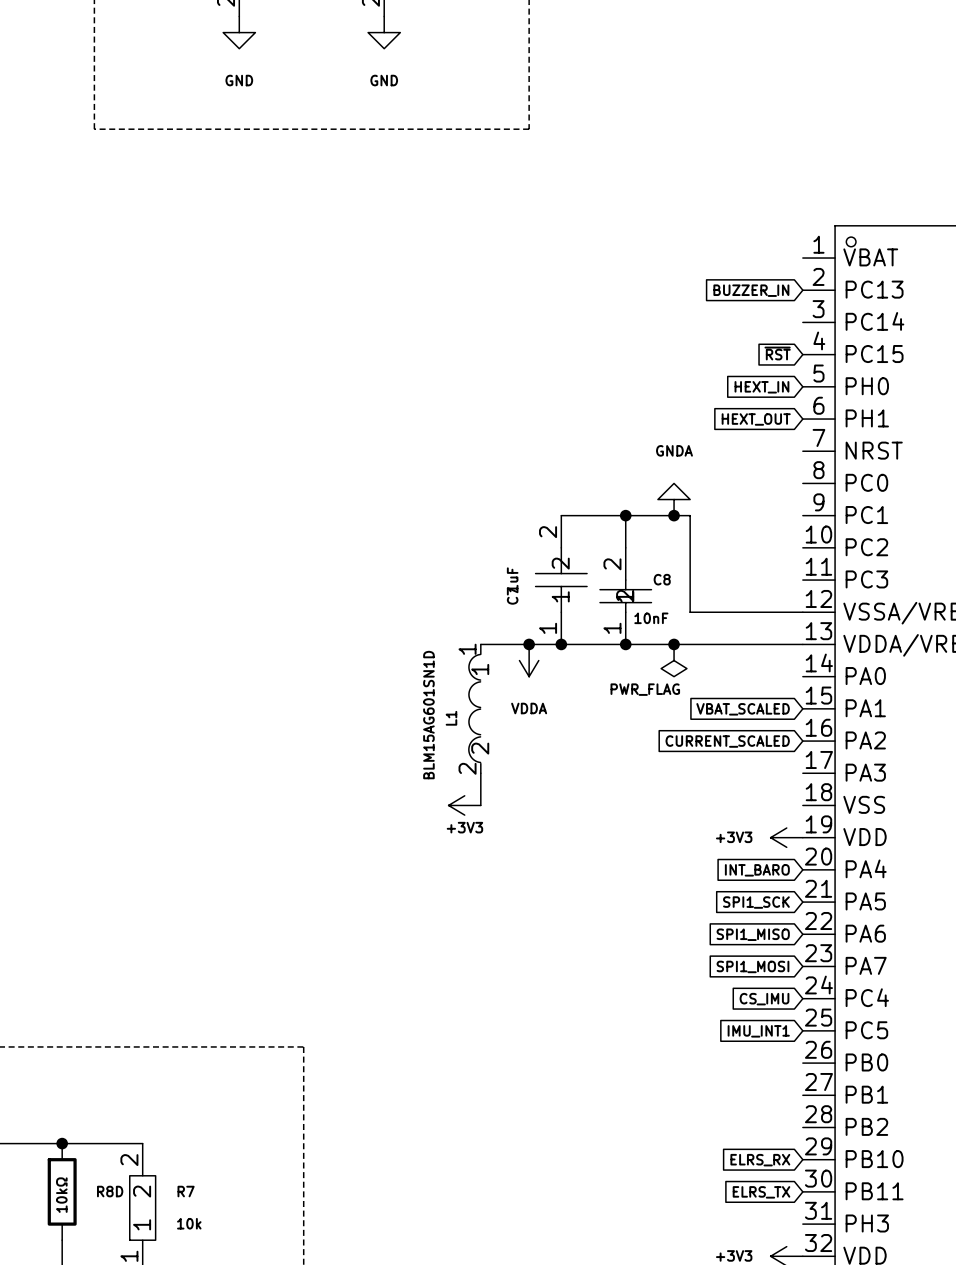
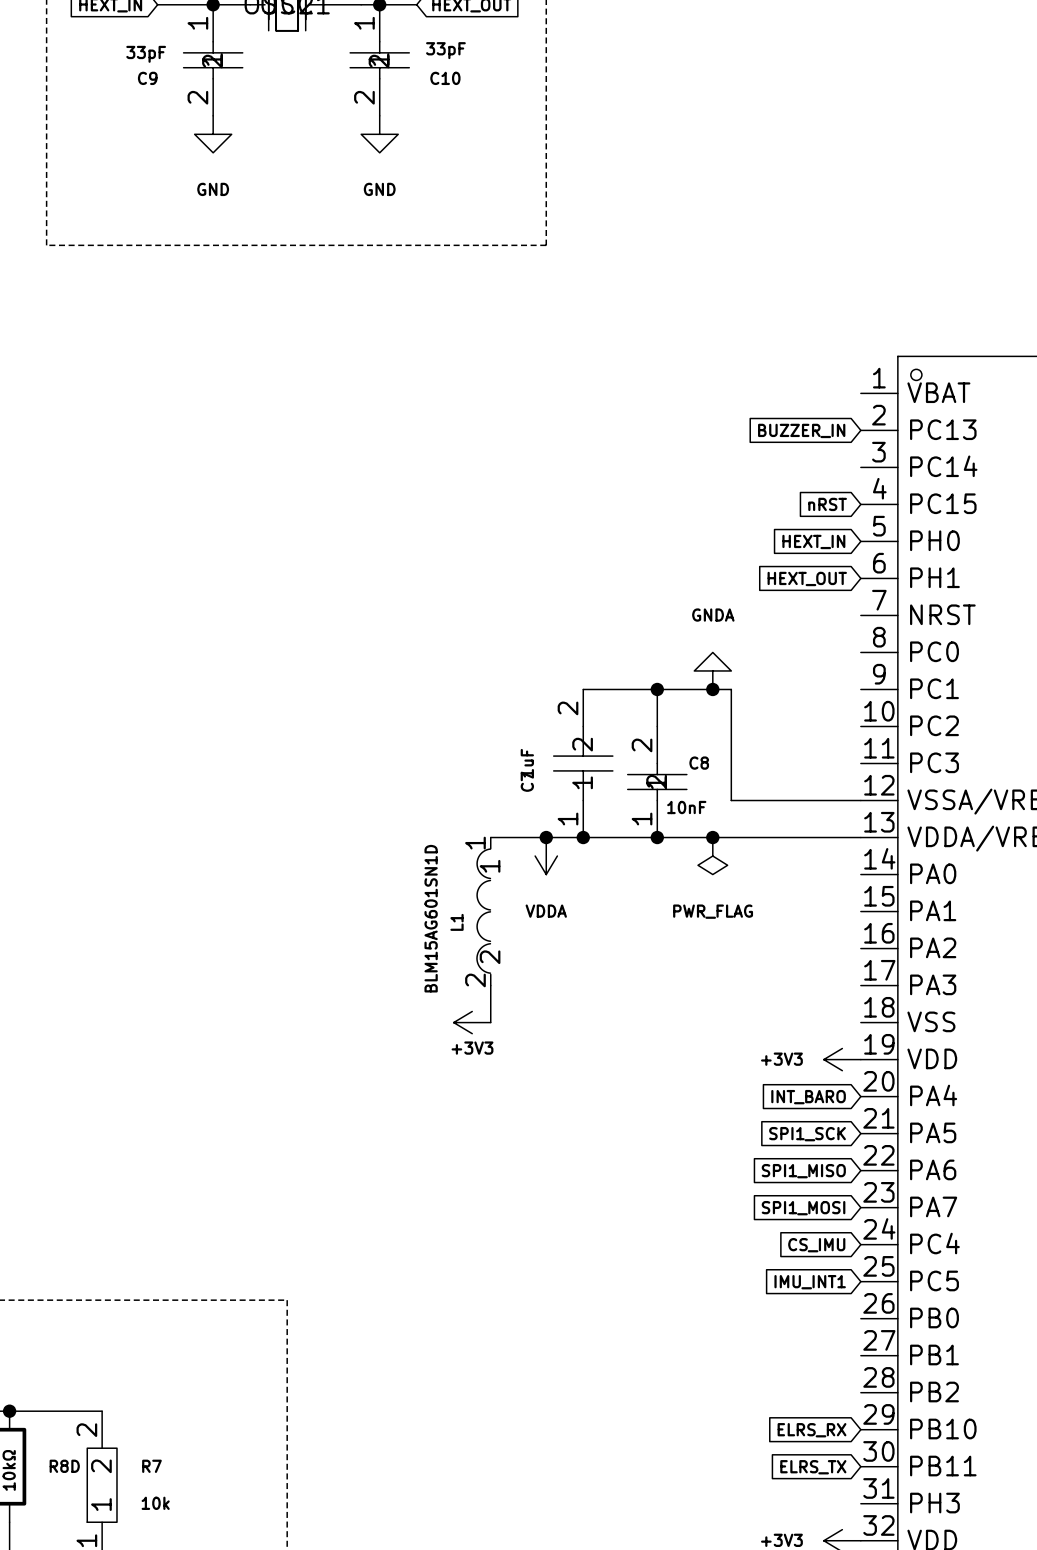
global label: ~{RST} (777, 353) -> nRST (827, 504)
power symbol text position: PWR_FLAG (645, 689) -> PWR_FLAG (713, 911)
global label: VBAT_SCALED (743, 709) -> none
global label: CURRENT_SCALED (727, 741) -> none

